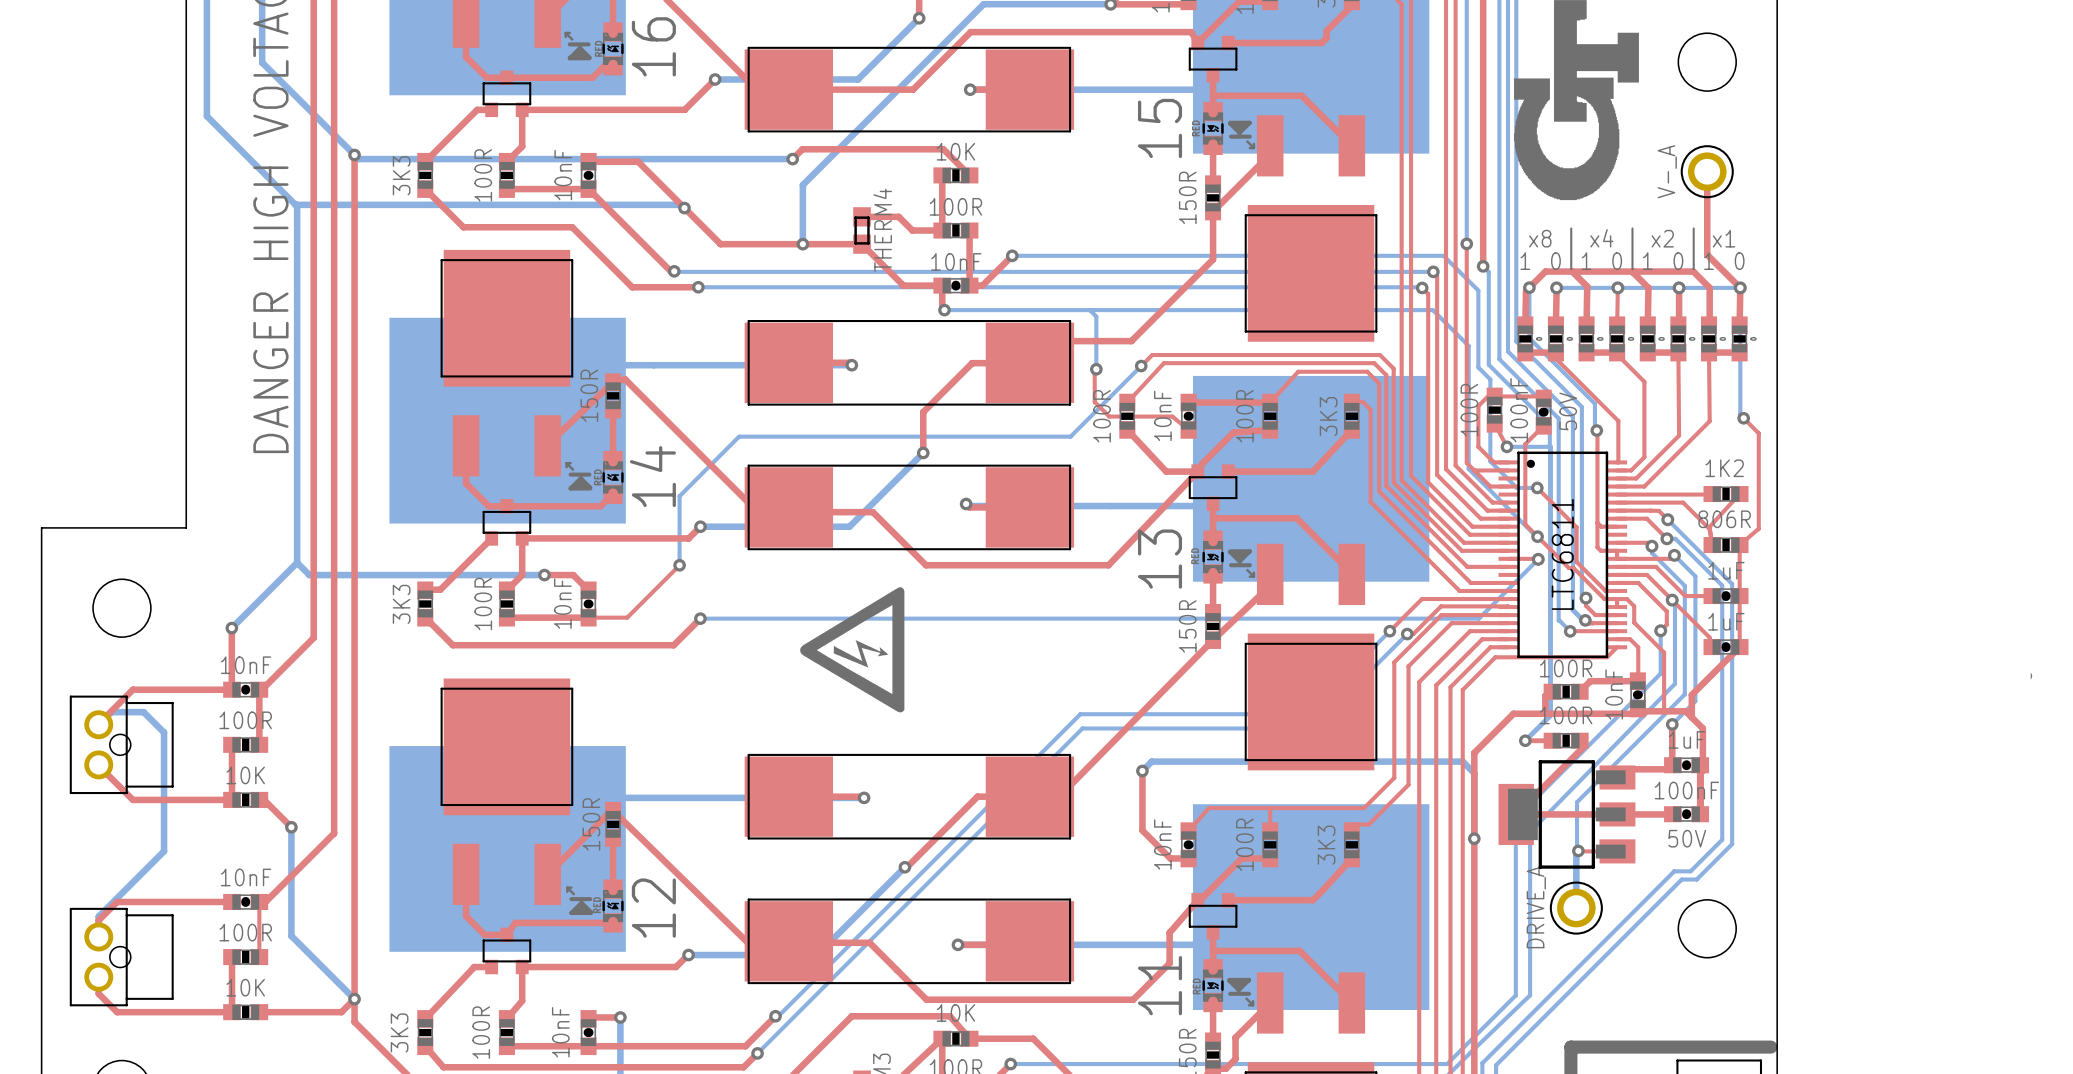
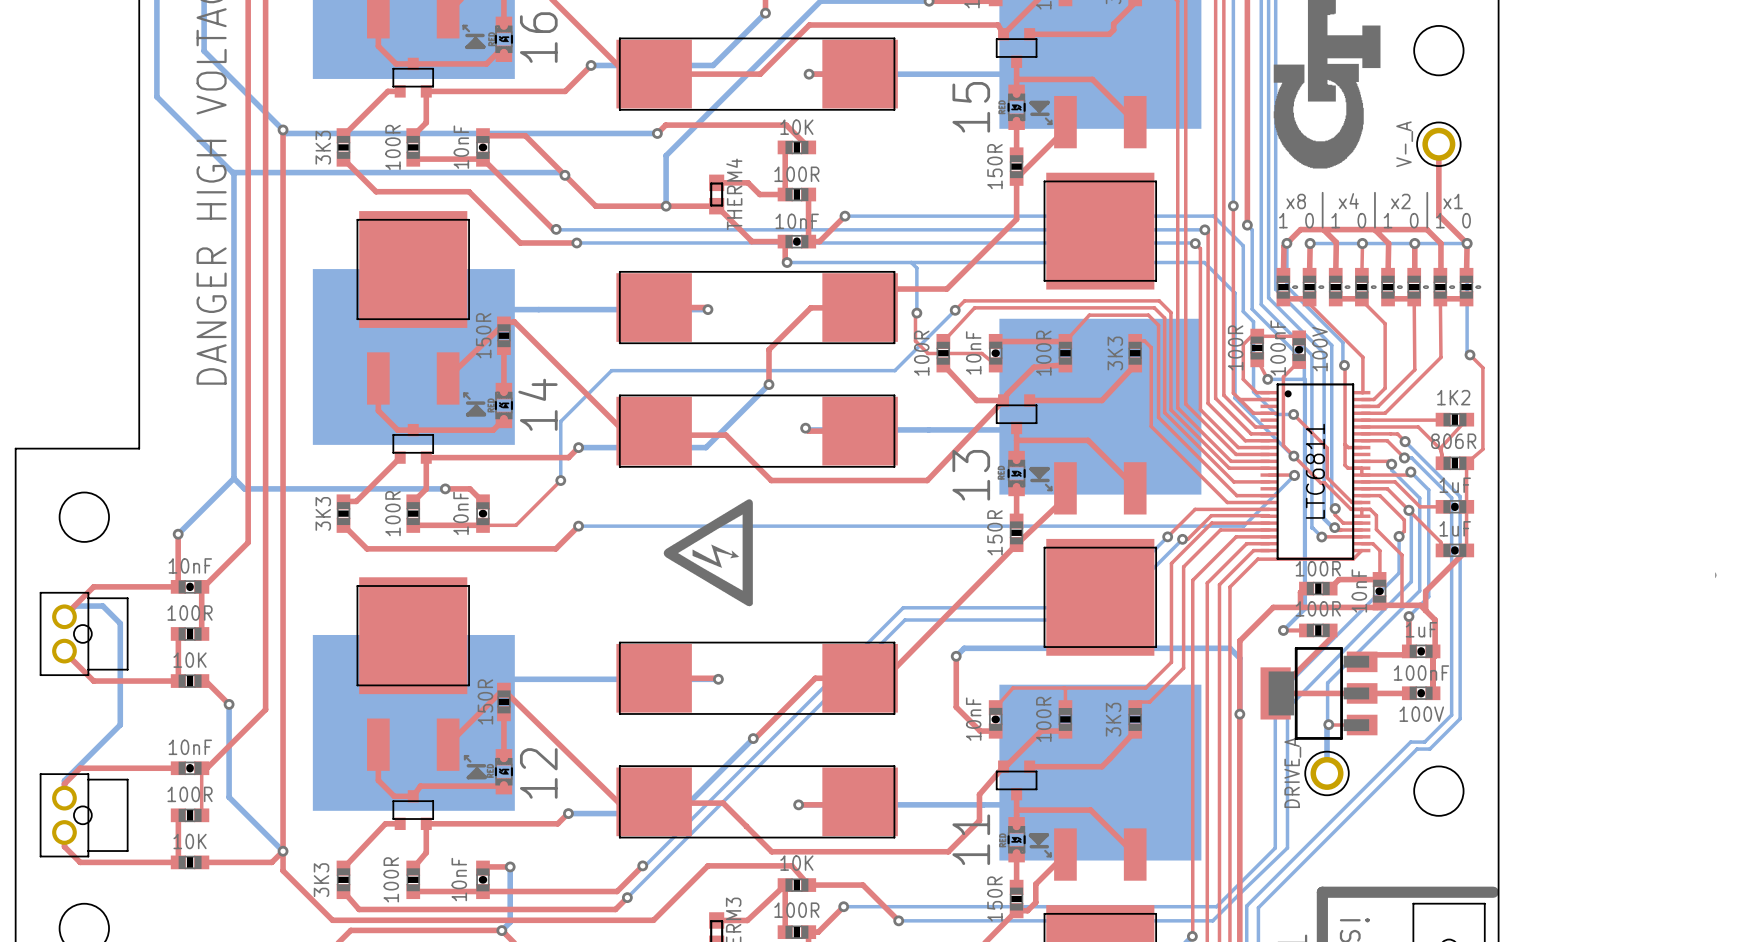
part text: 50V (1568, 411) -> 100V (1320, 349)
part text: 50V (1687, 838) -> 100V (1421, 714)

